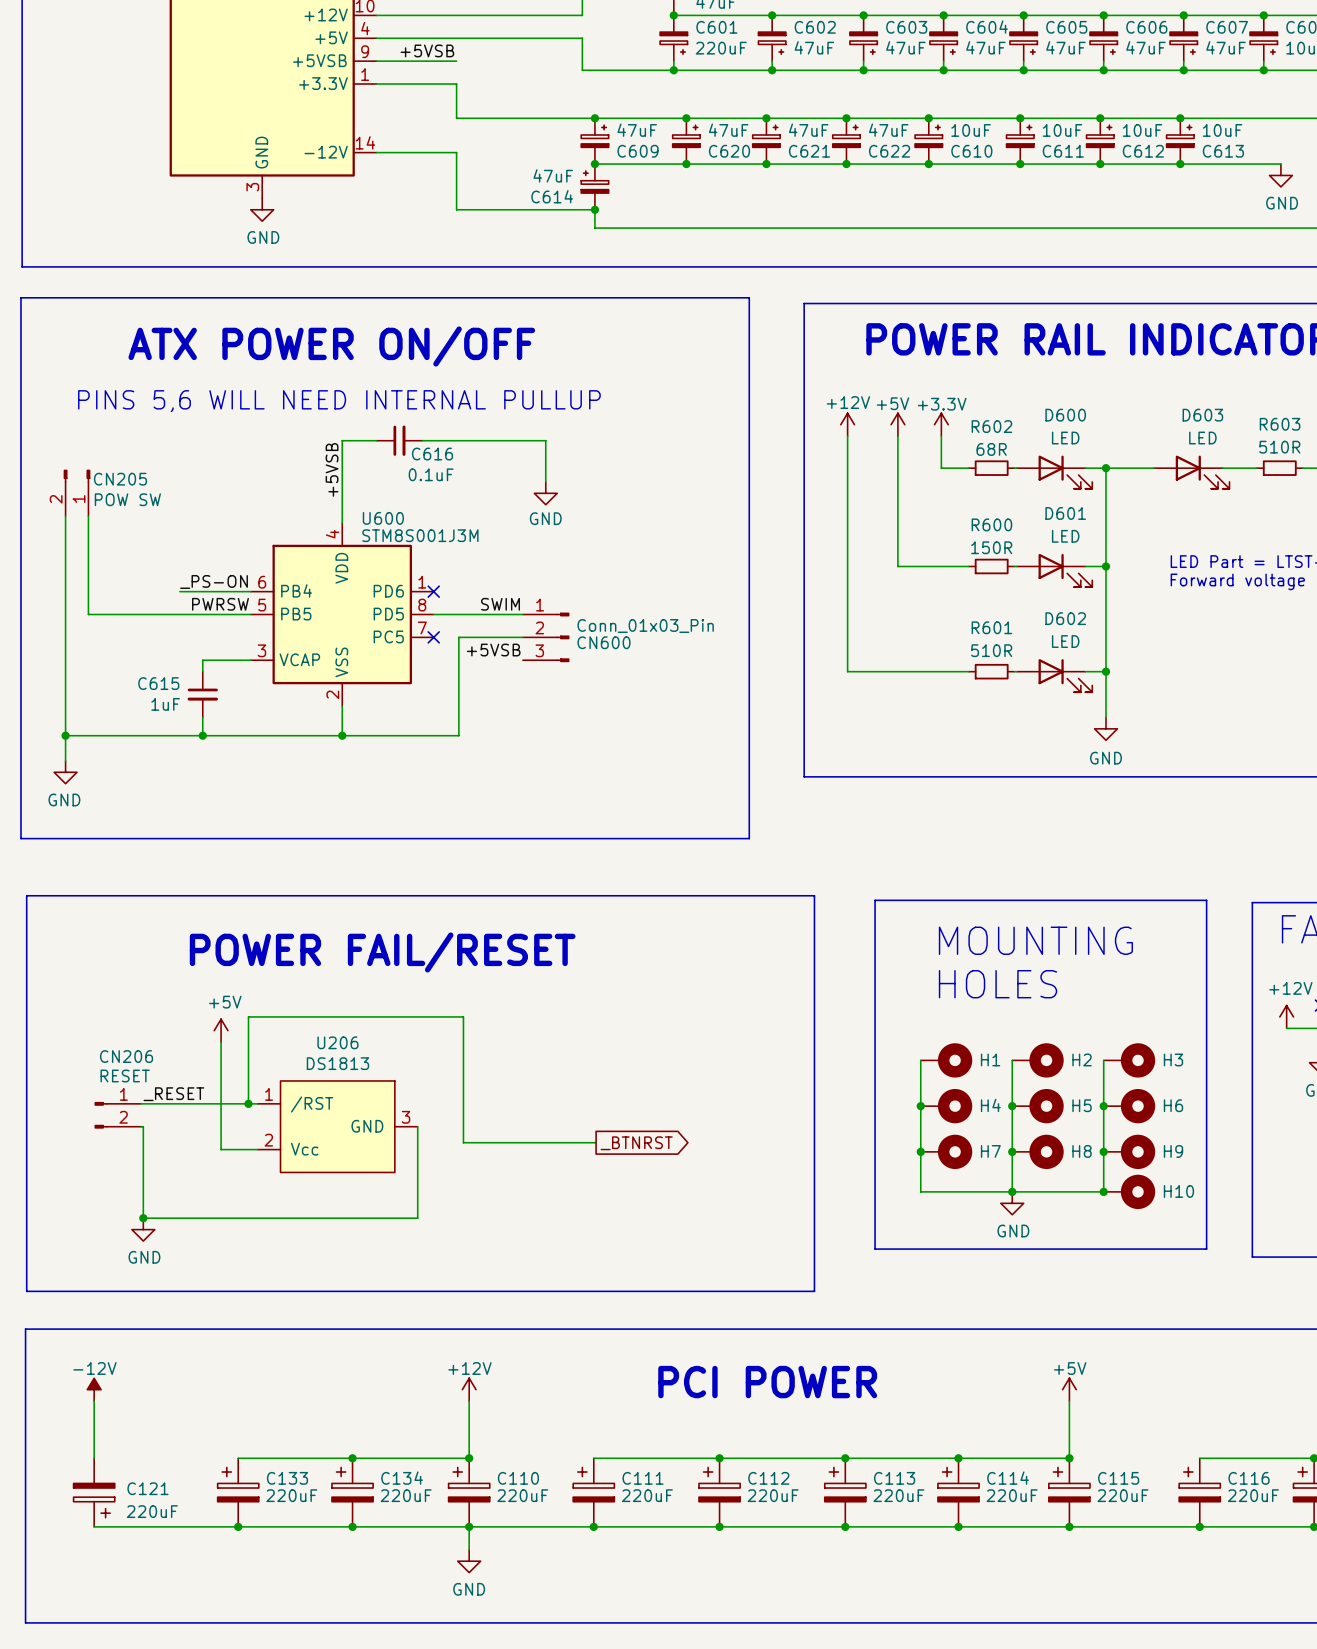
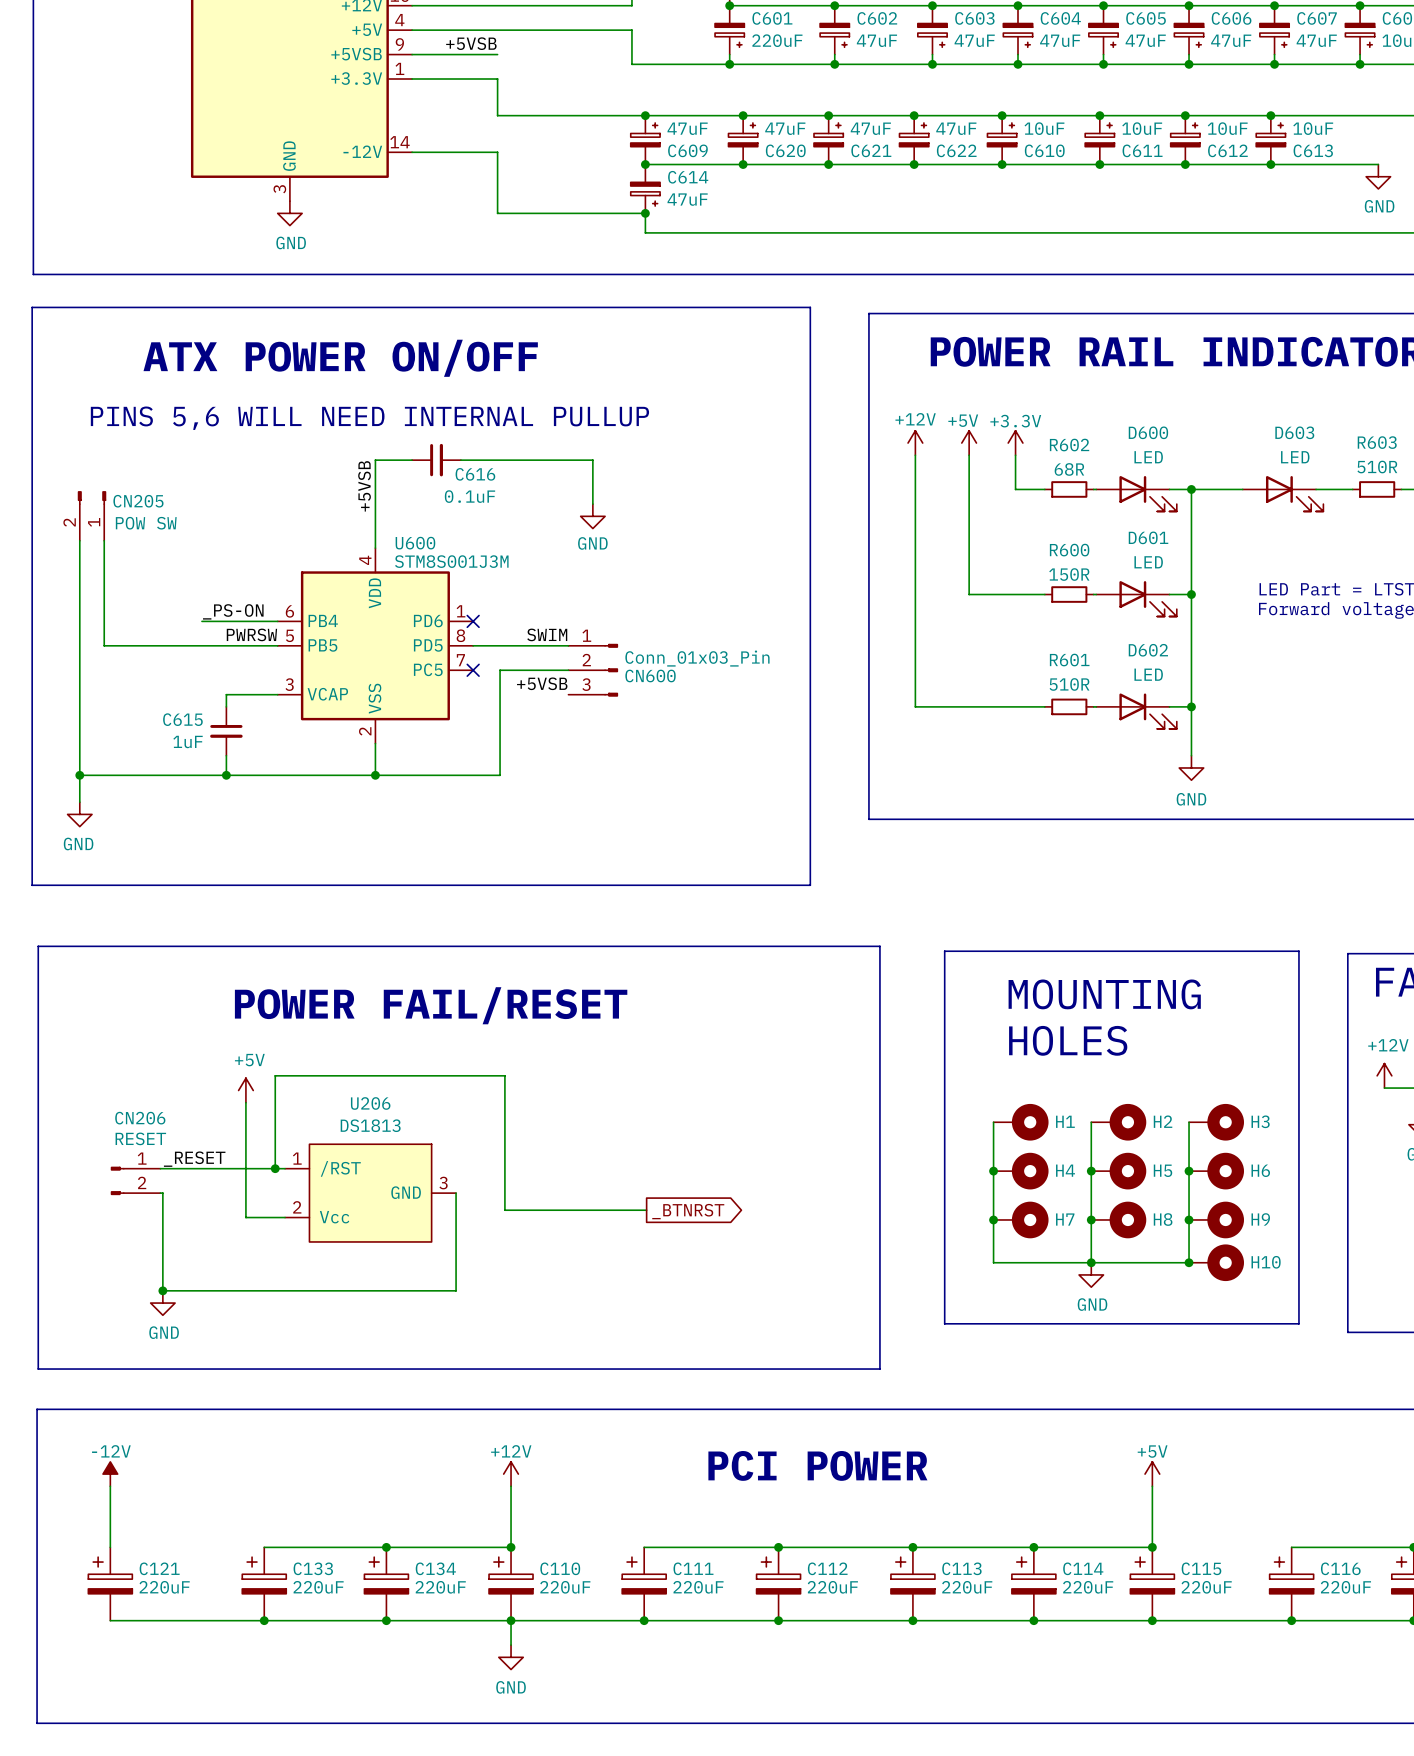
C614 rotation: 0° (594, 181) -> 180° (645, 194)
C121 rotation: 0° (94, 1500) -> 180° (110, 1575)

